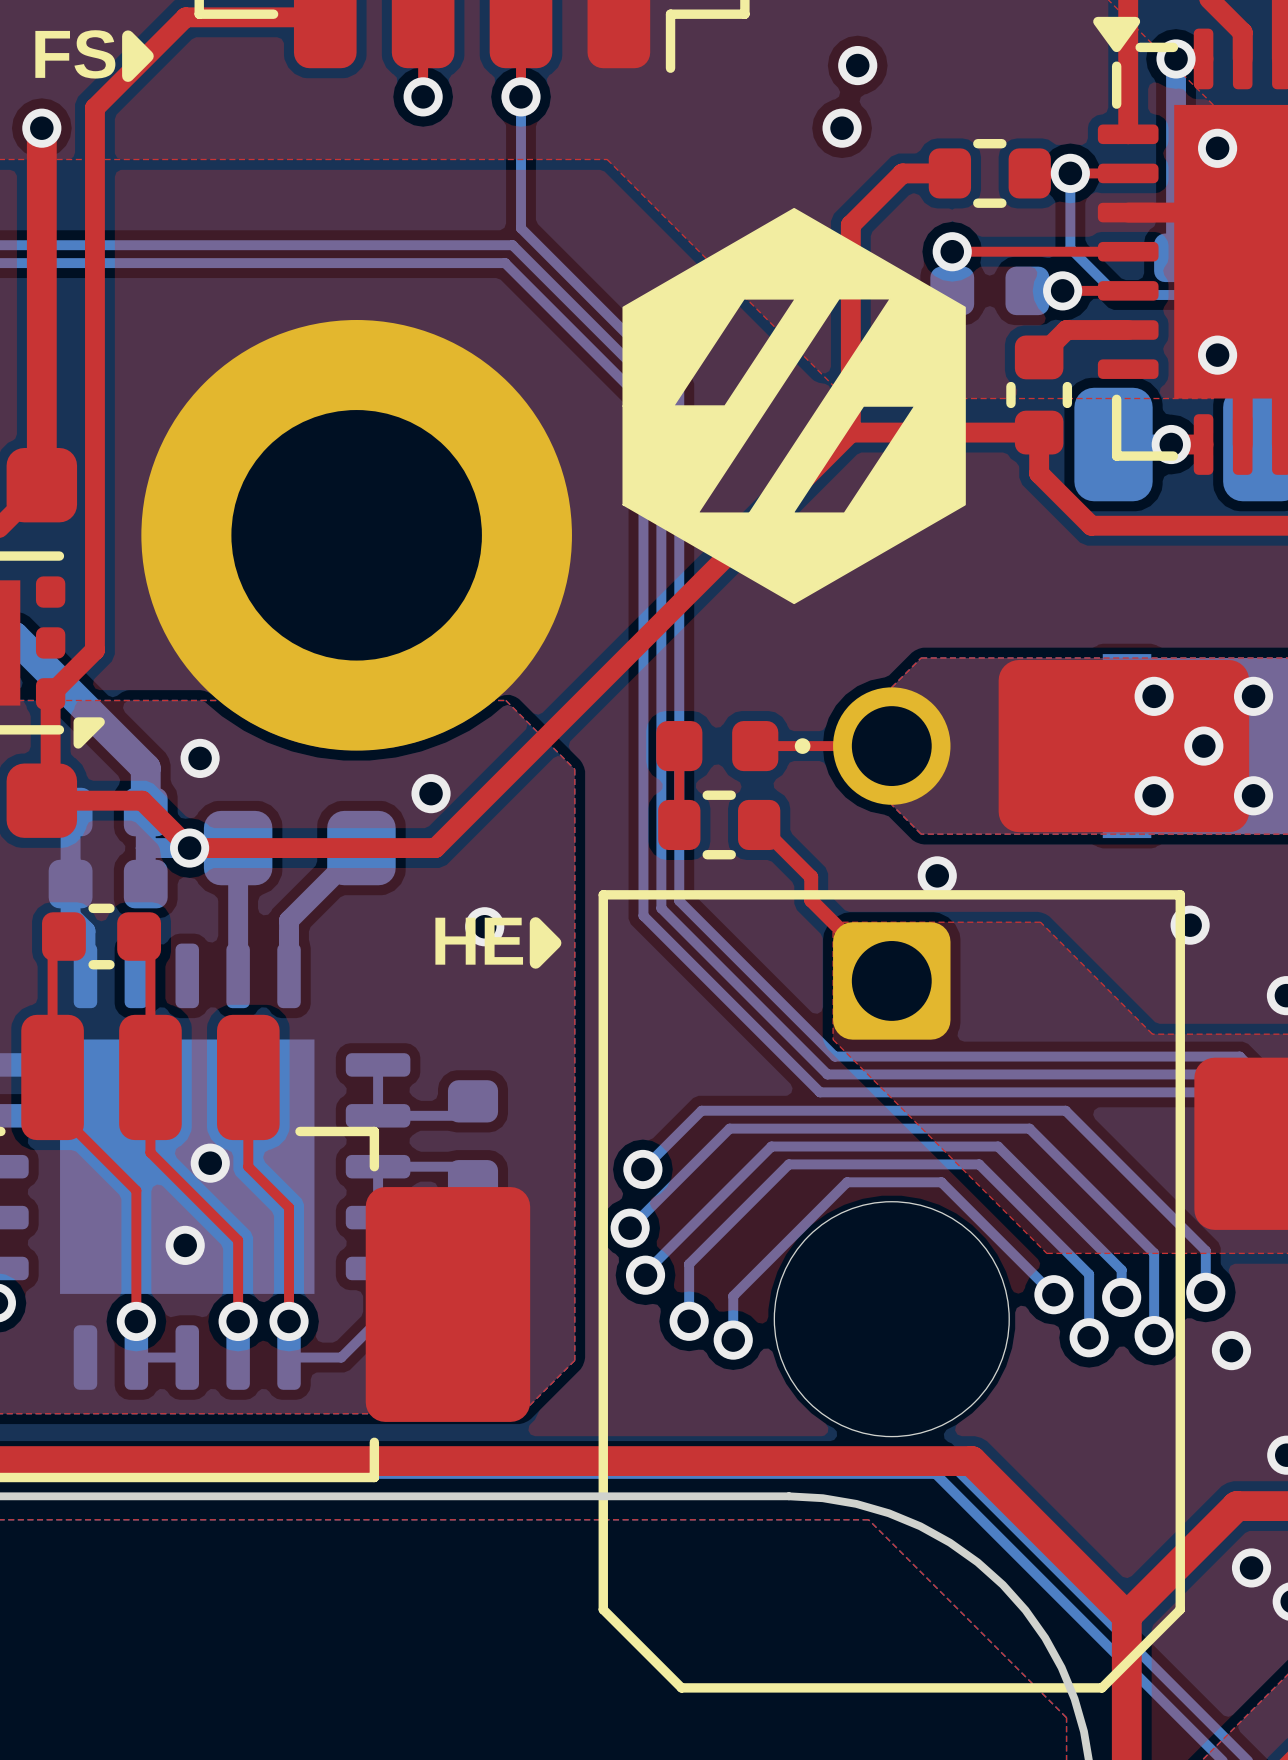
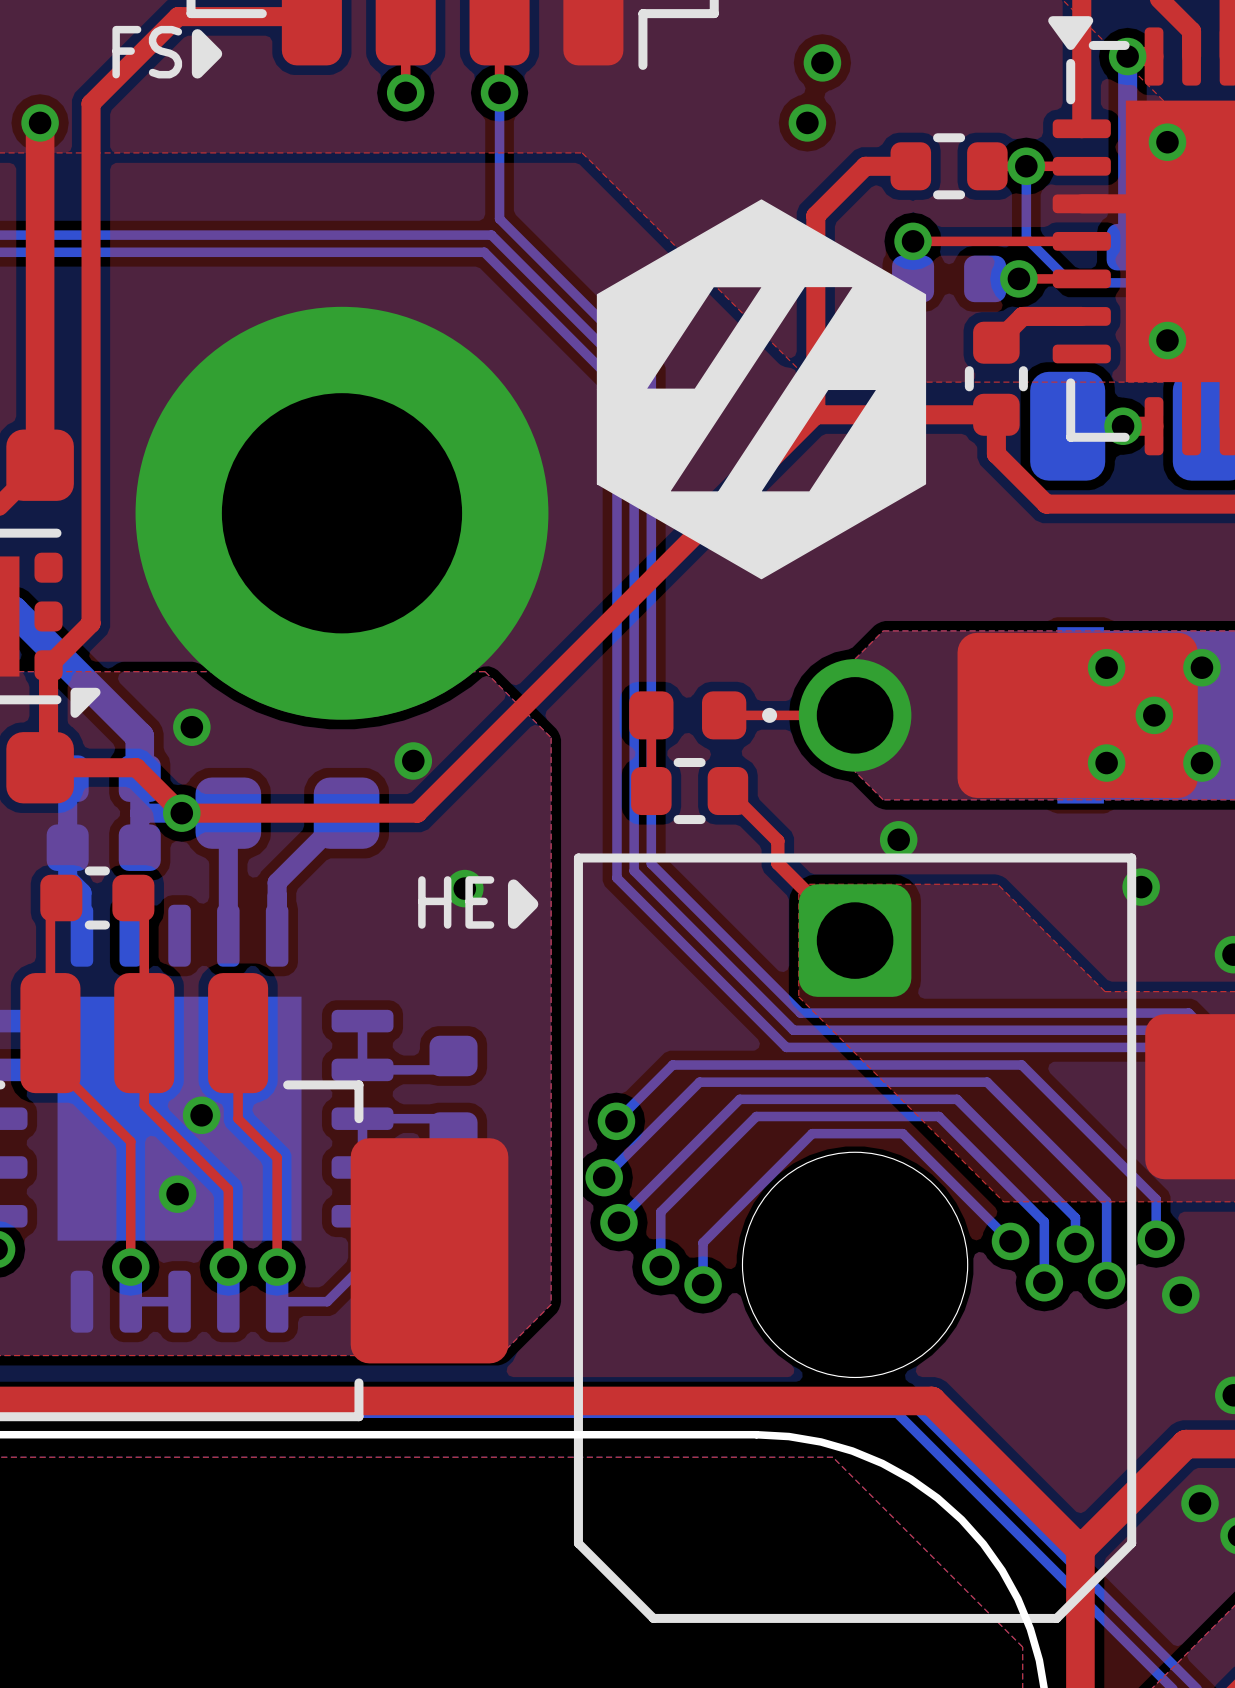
text position: FS (75, 54) -> FS (147, 52)
drawing position: (137, 56) -> (207, 53)

